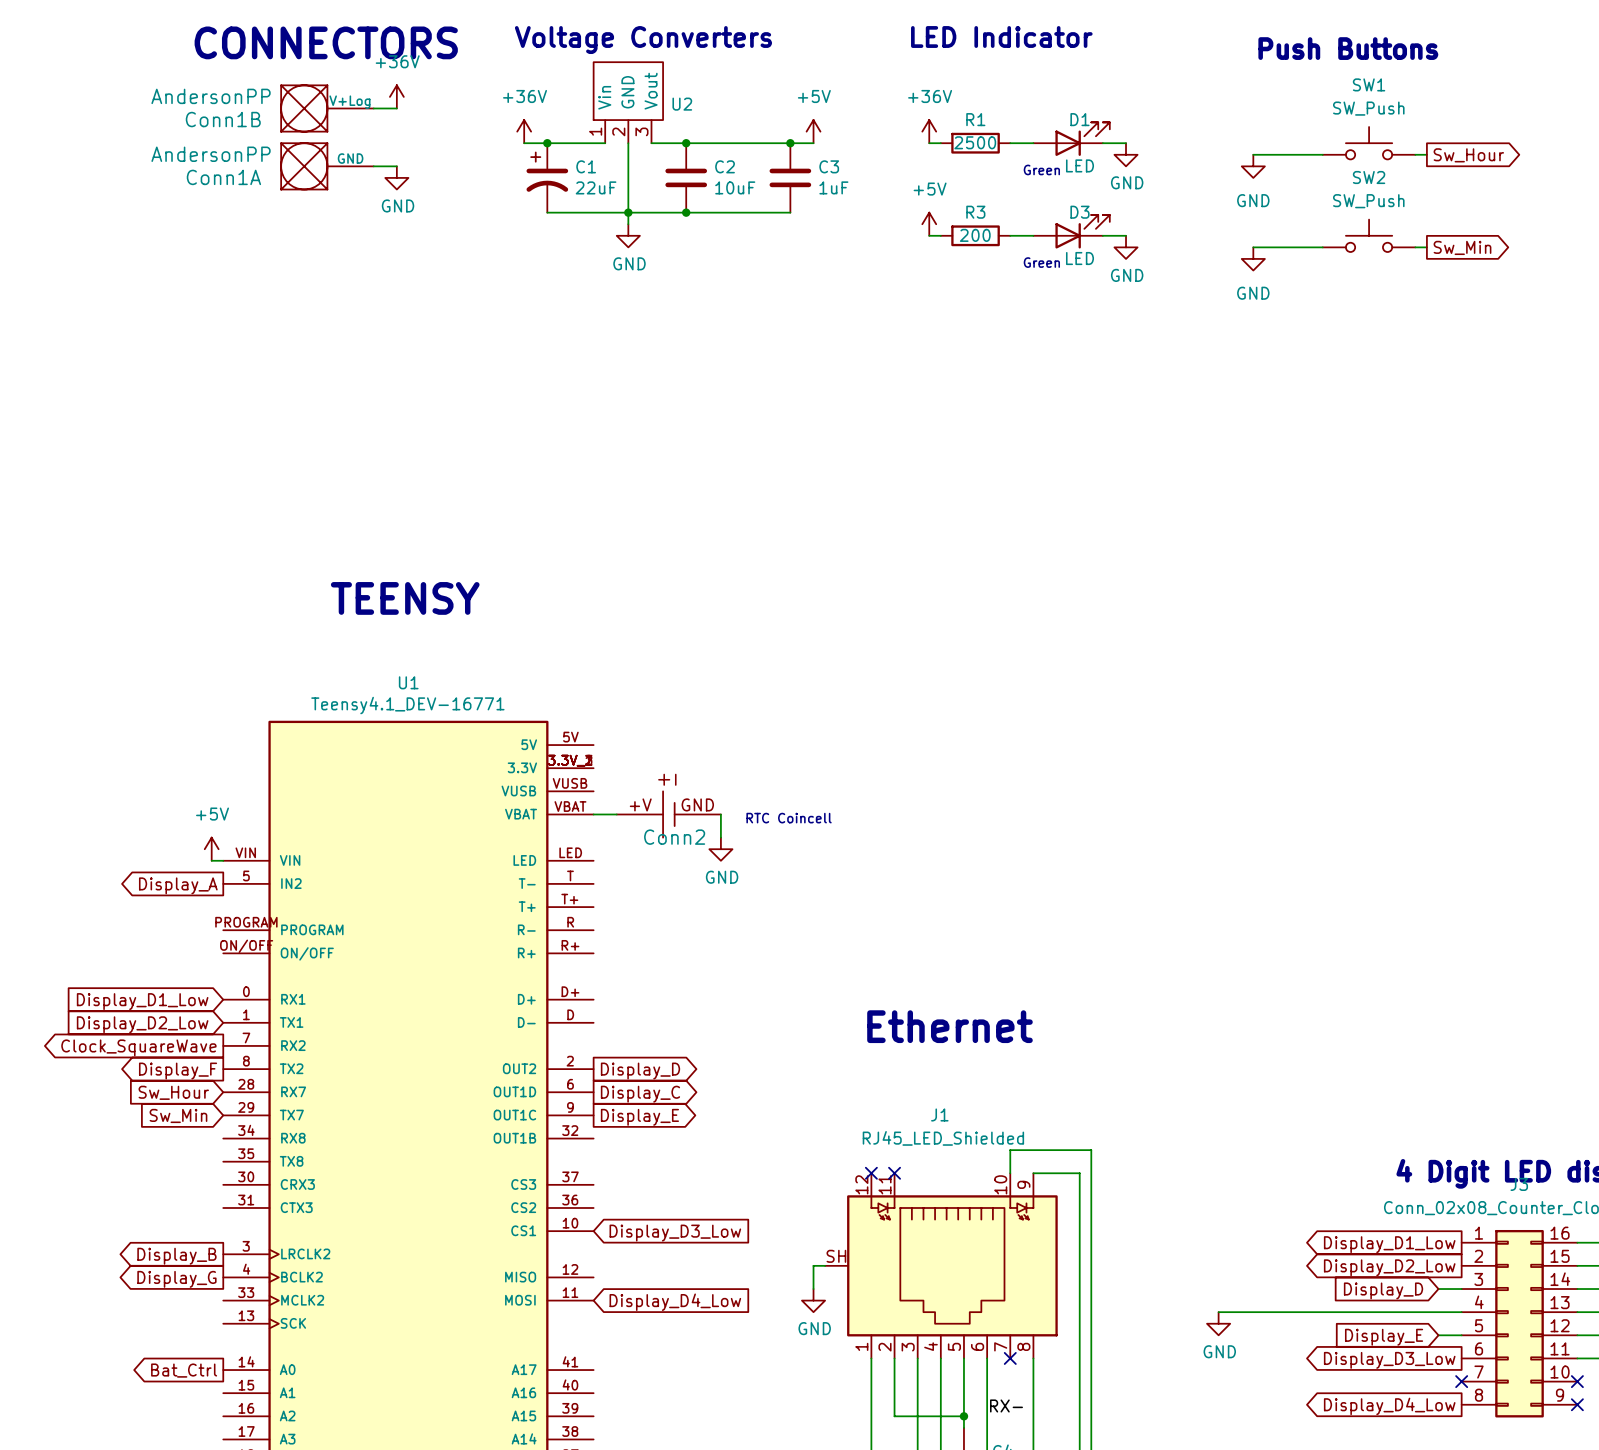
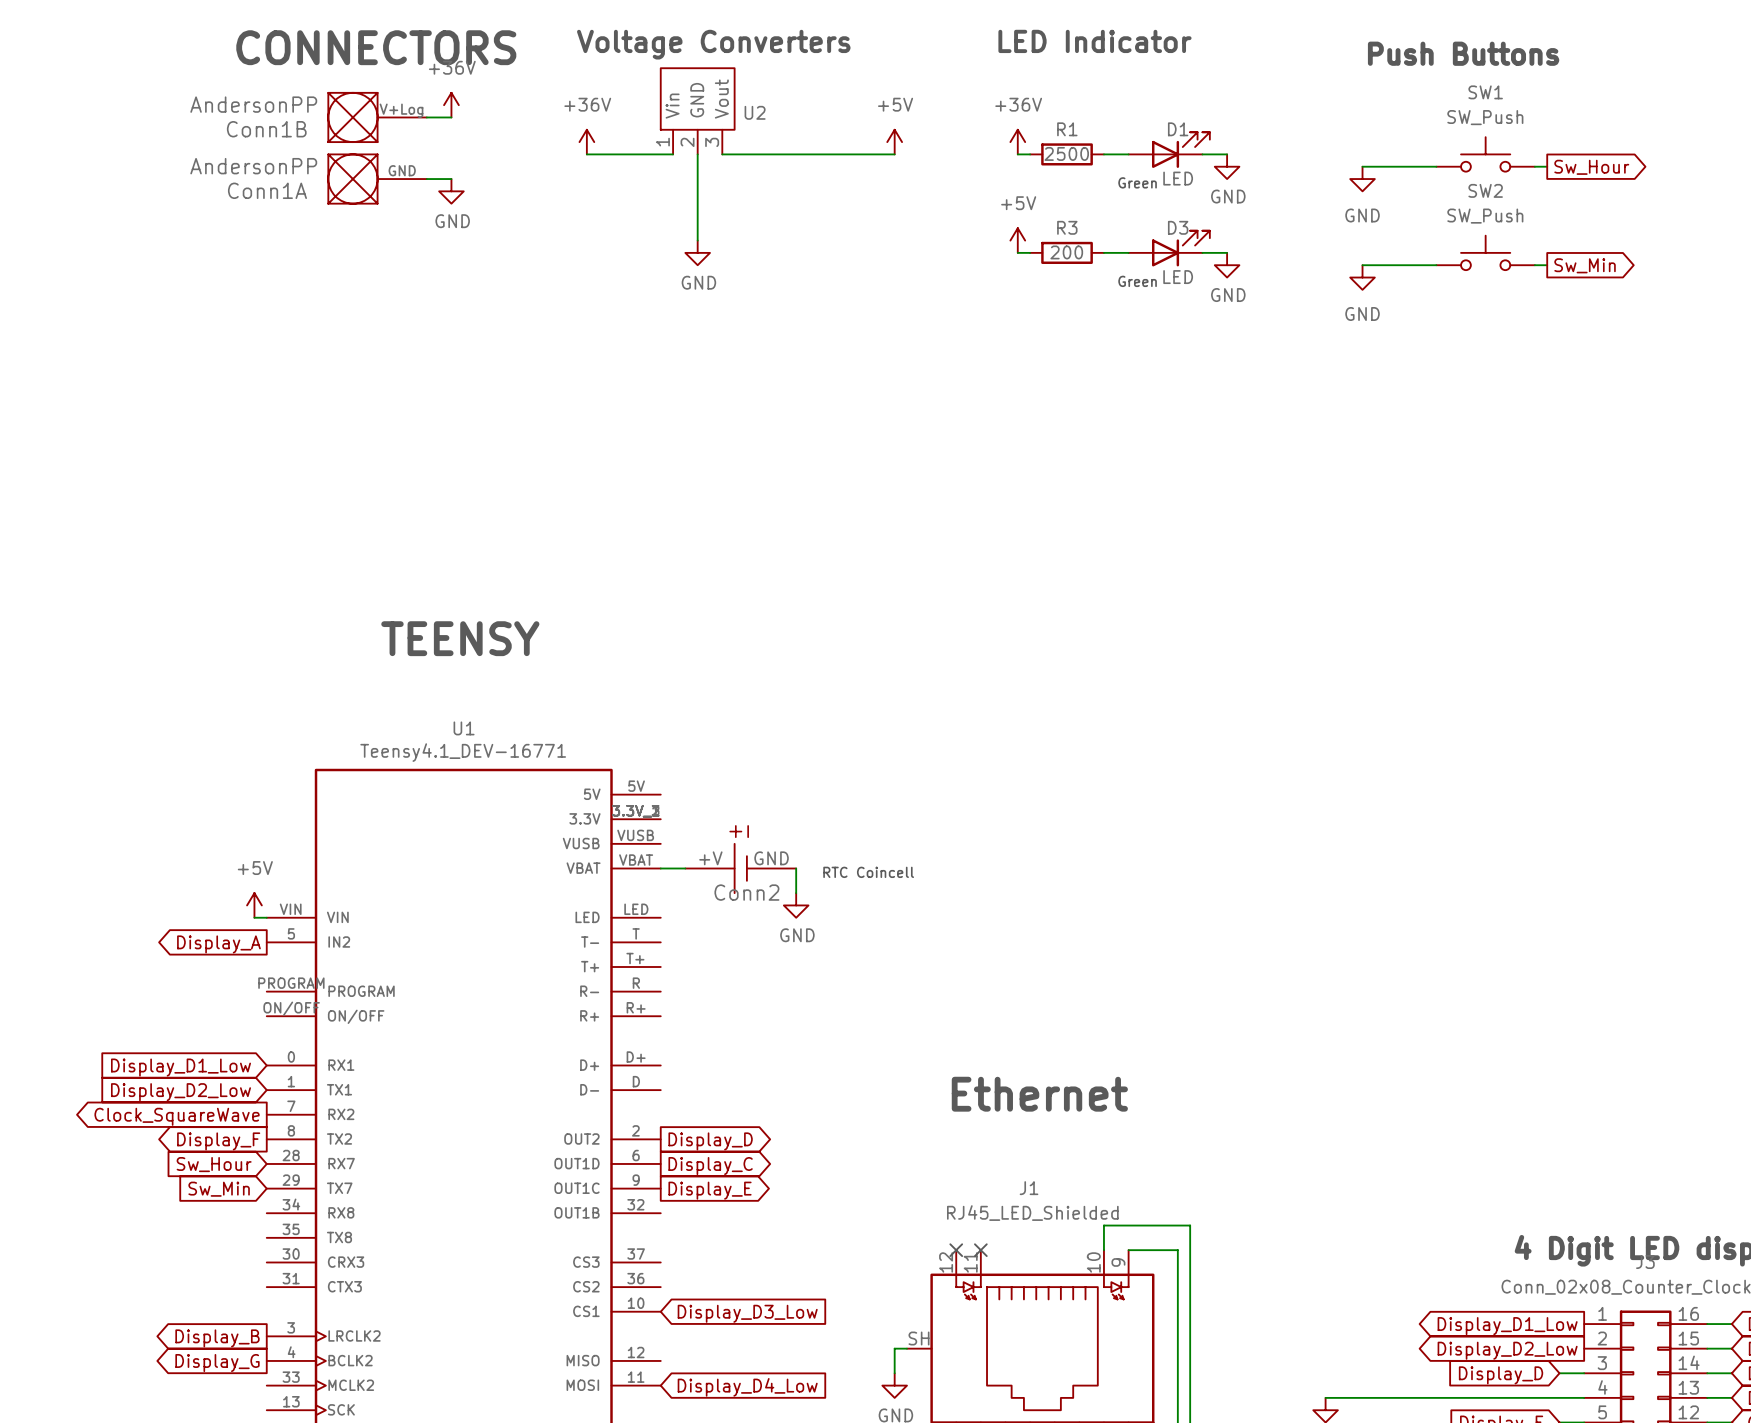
junction: (547, 143) -> none
junction: (686, 143) -> none
junction: (790, 143) -> none
C1: 22uF (547, 177) -> none
C2: 10uF (686, 177) -> none
C3: 1uF (790, 177) -> none
wire: (547, 212) (790, 212) -> none
junction: (628, 212) -> none
junction: (686, 212) -> none

